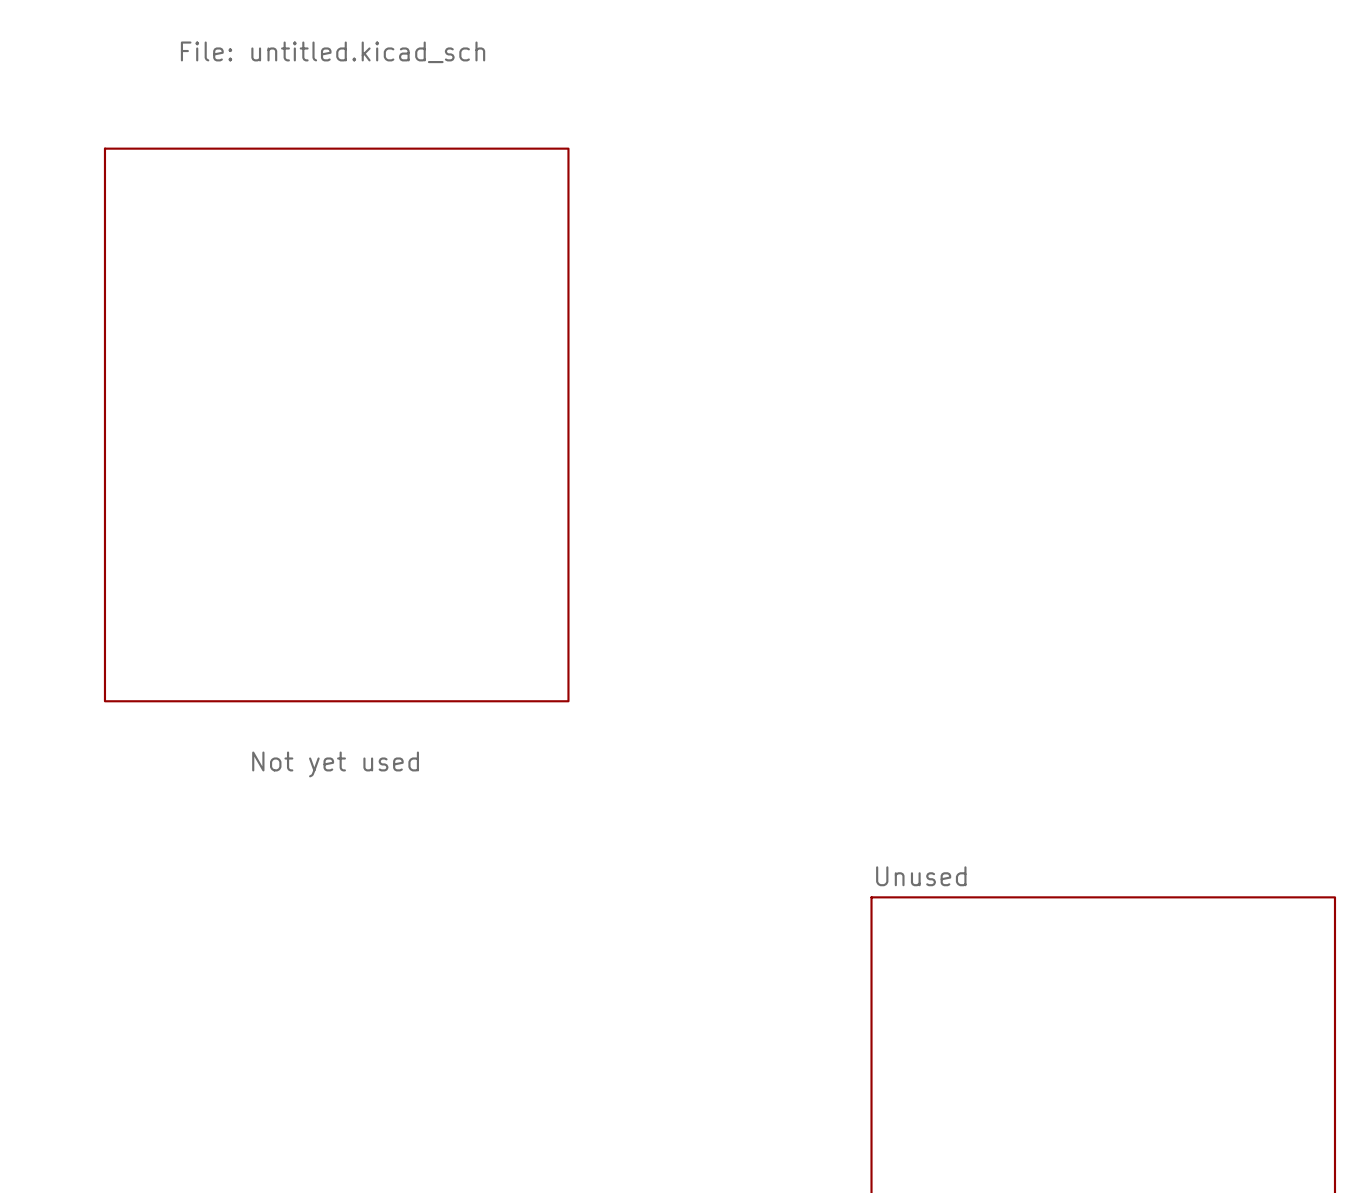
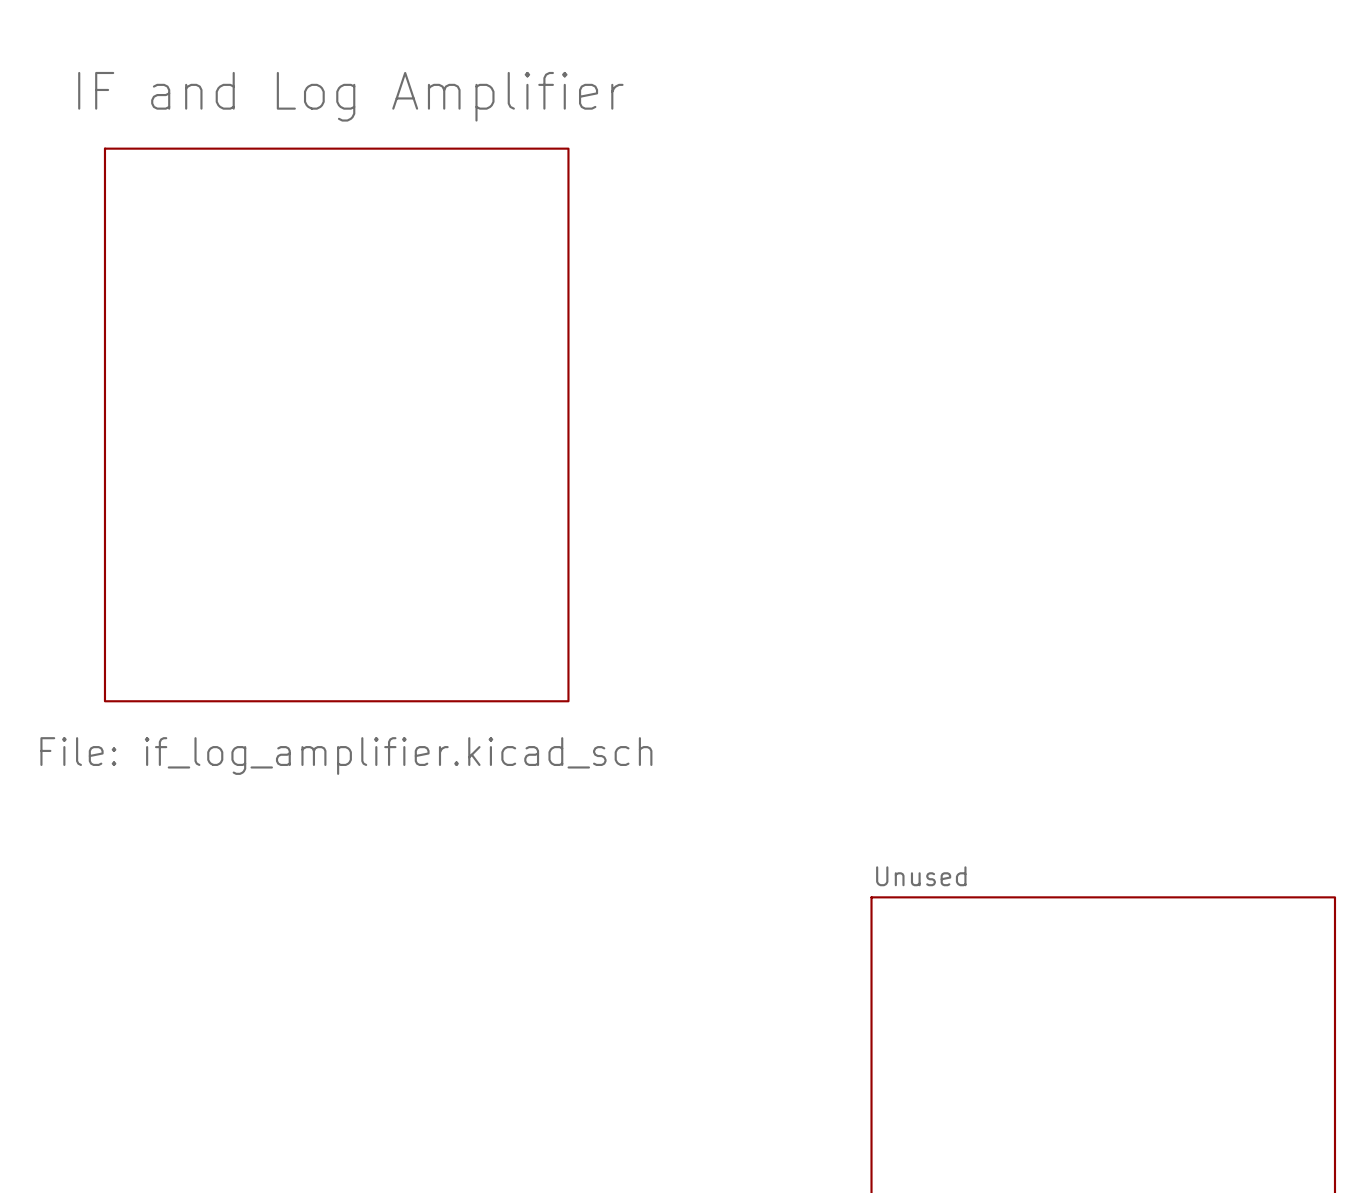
sheet Not yet used value: File: untitled.kicad_sch (333, 52) -> File: if_log_amplifier.kicad_sch (346, 756)
sheet Not yet used name: Not yet used (335, 764) -> IF and Log Amplifier (350, 96)

